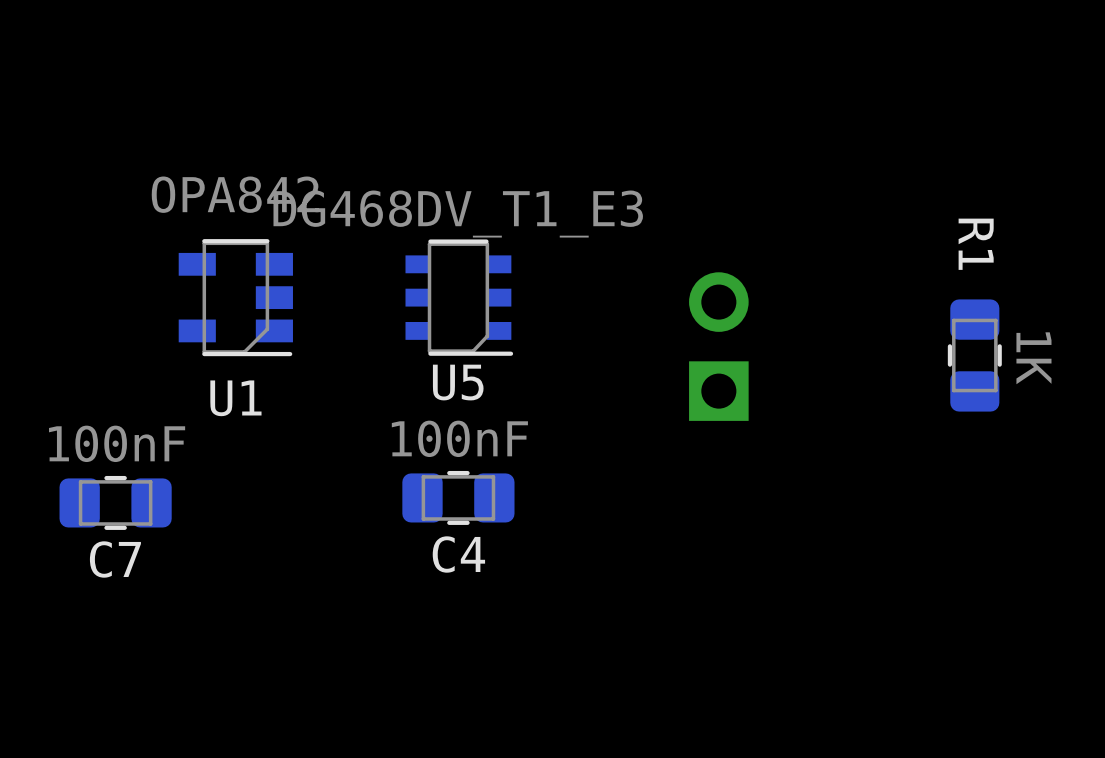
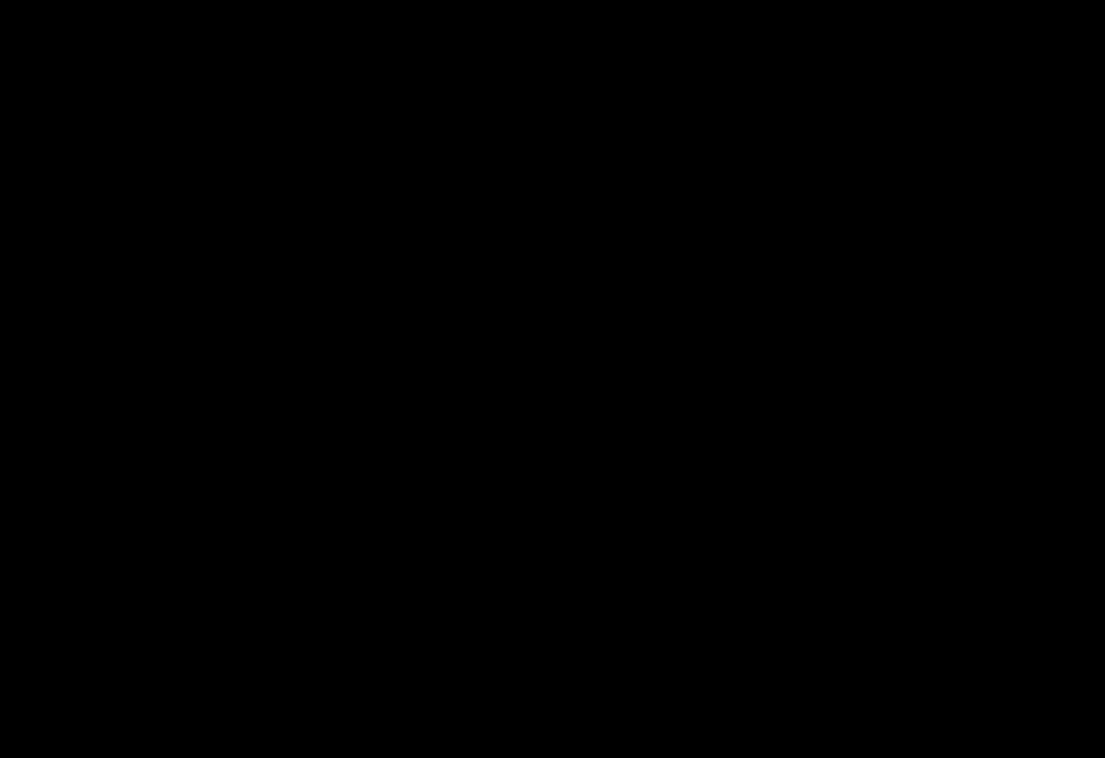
U1: OPA842 (235, 297) -> none
U5: DG468DV_T1_E3 (459, 297) -> none
part: (718, 346) -> none
R1: 1K (974, 355) -> none
C4: 100nF (458, 497) -> none
C7: 100nF (115, 502) -> none

